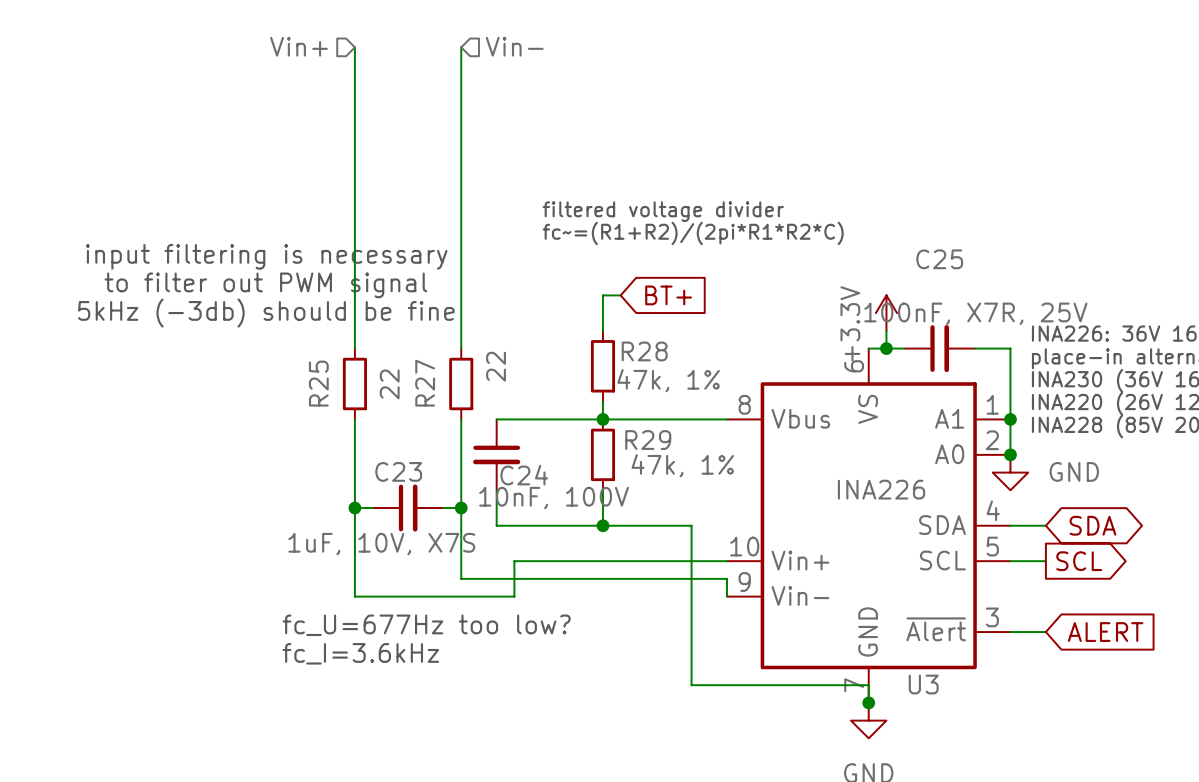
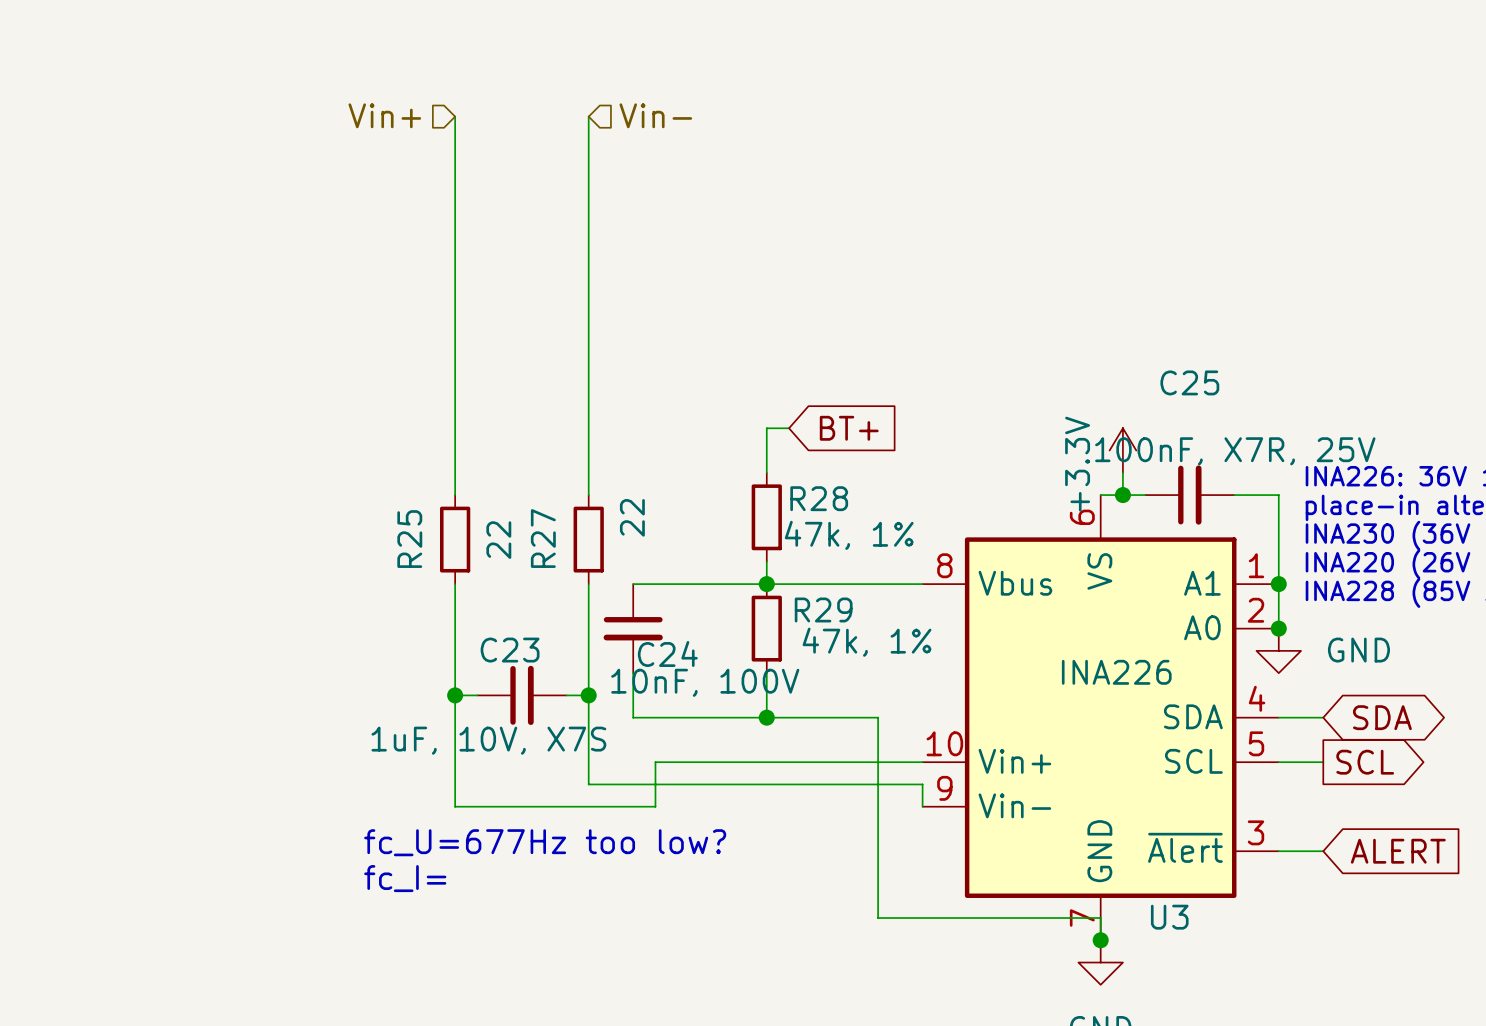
text: filtered voltage divider (663, 211) -> none
text: fc~=(R1+R2)/(2pi*R1*R2*C) (693, 233) -> none
text: input filtering is necessary (266, 256) -> none
text: to filter out PWM signal (265, 285) -> none
text: 5kHz (-3db) should be fine (266, 313) -> none
text: fc_I=3.6kHz (360, 653) -> fc_I= (405, 878)

